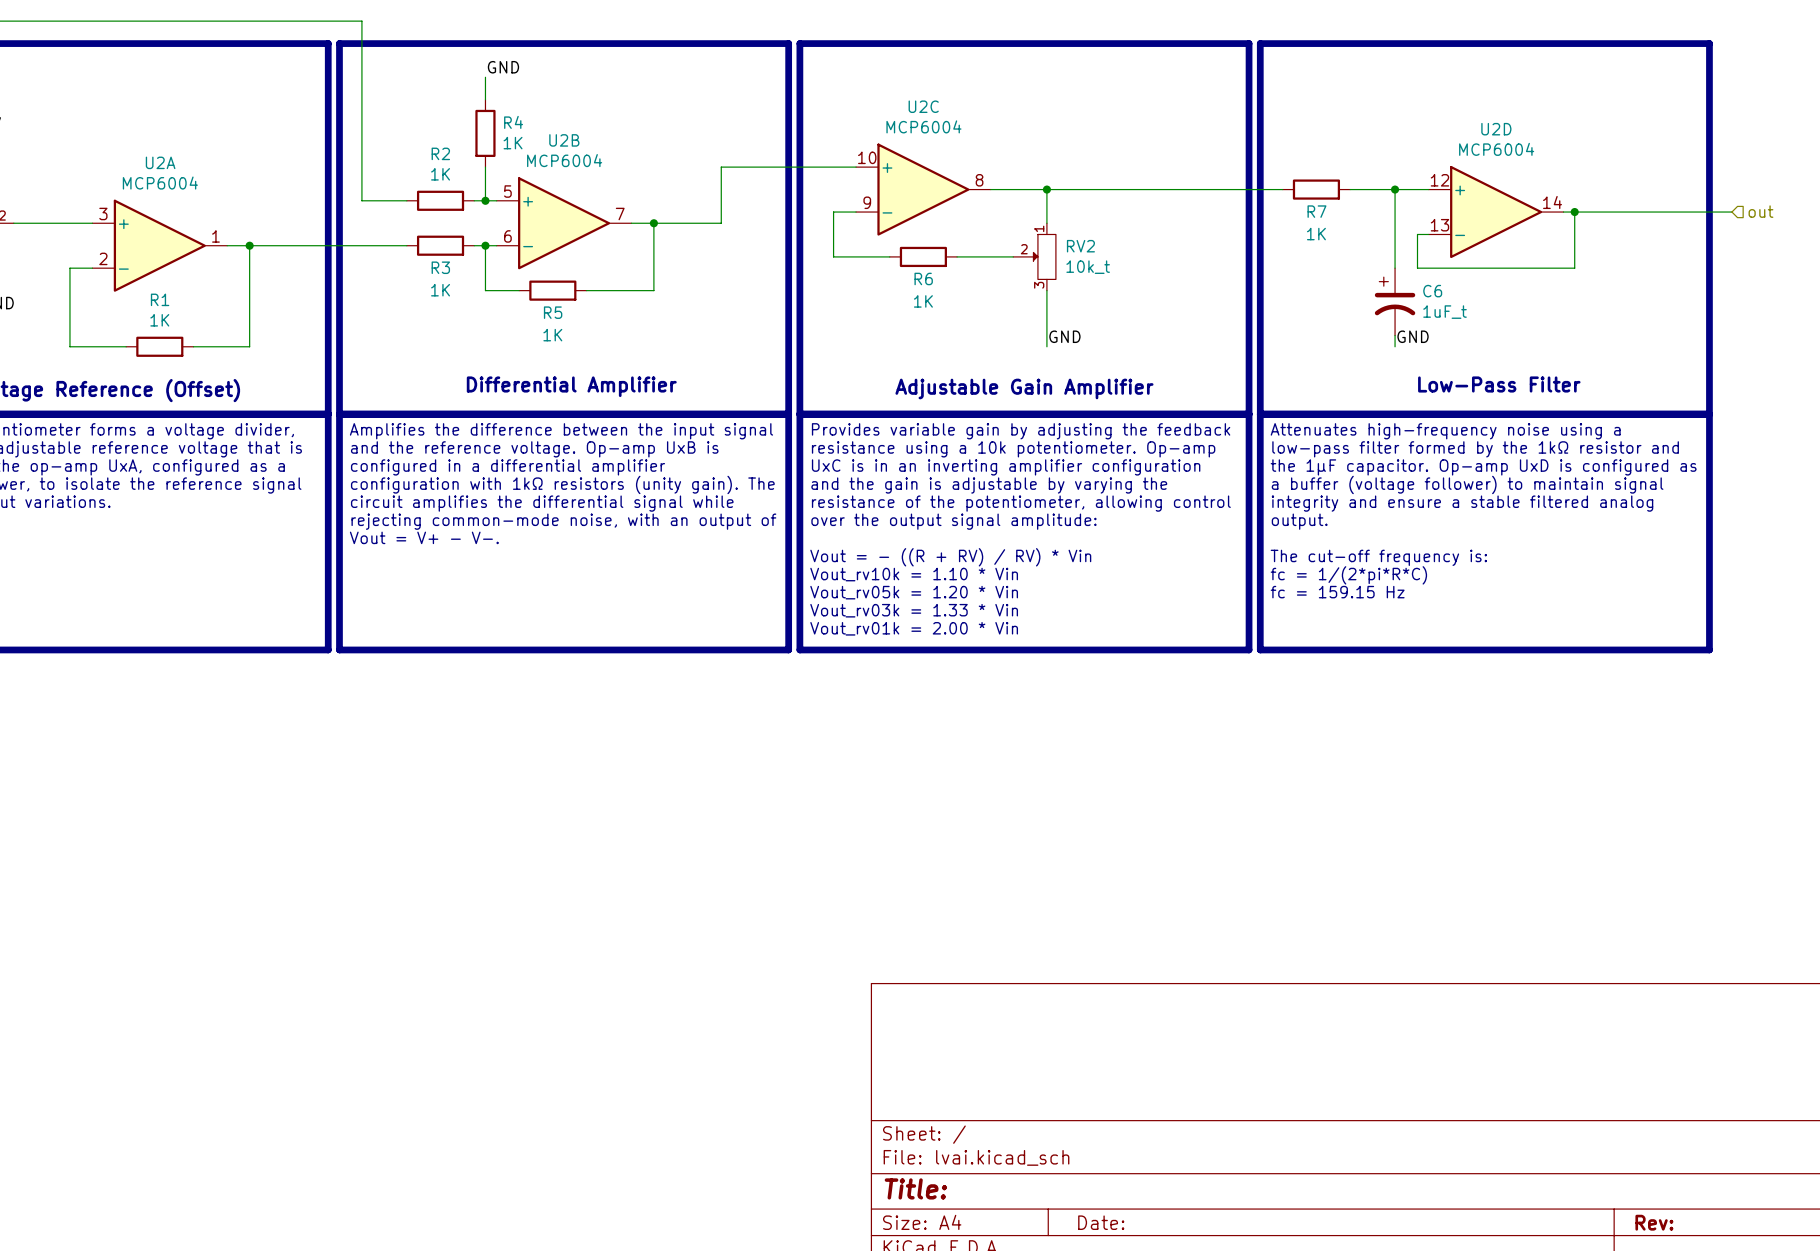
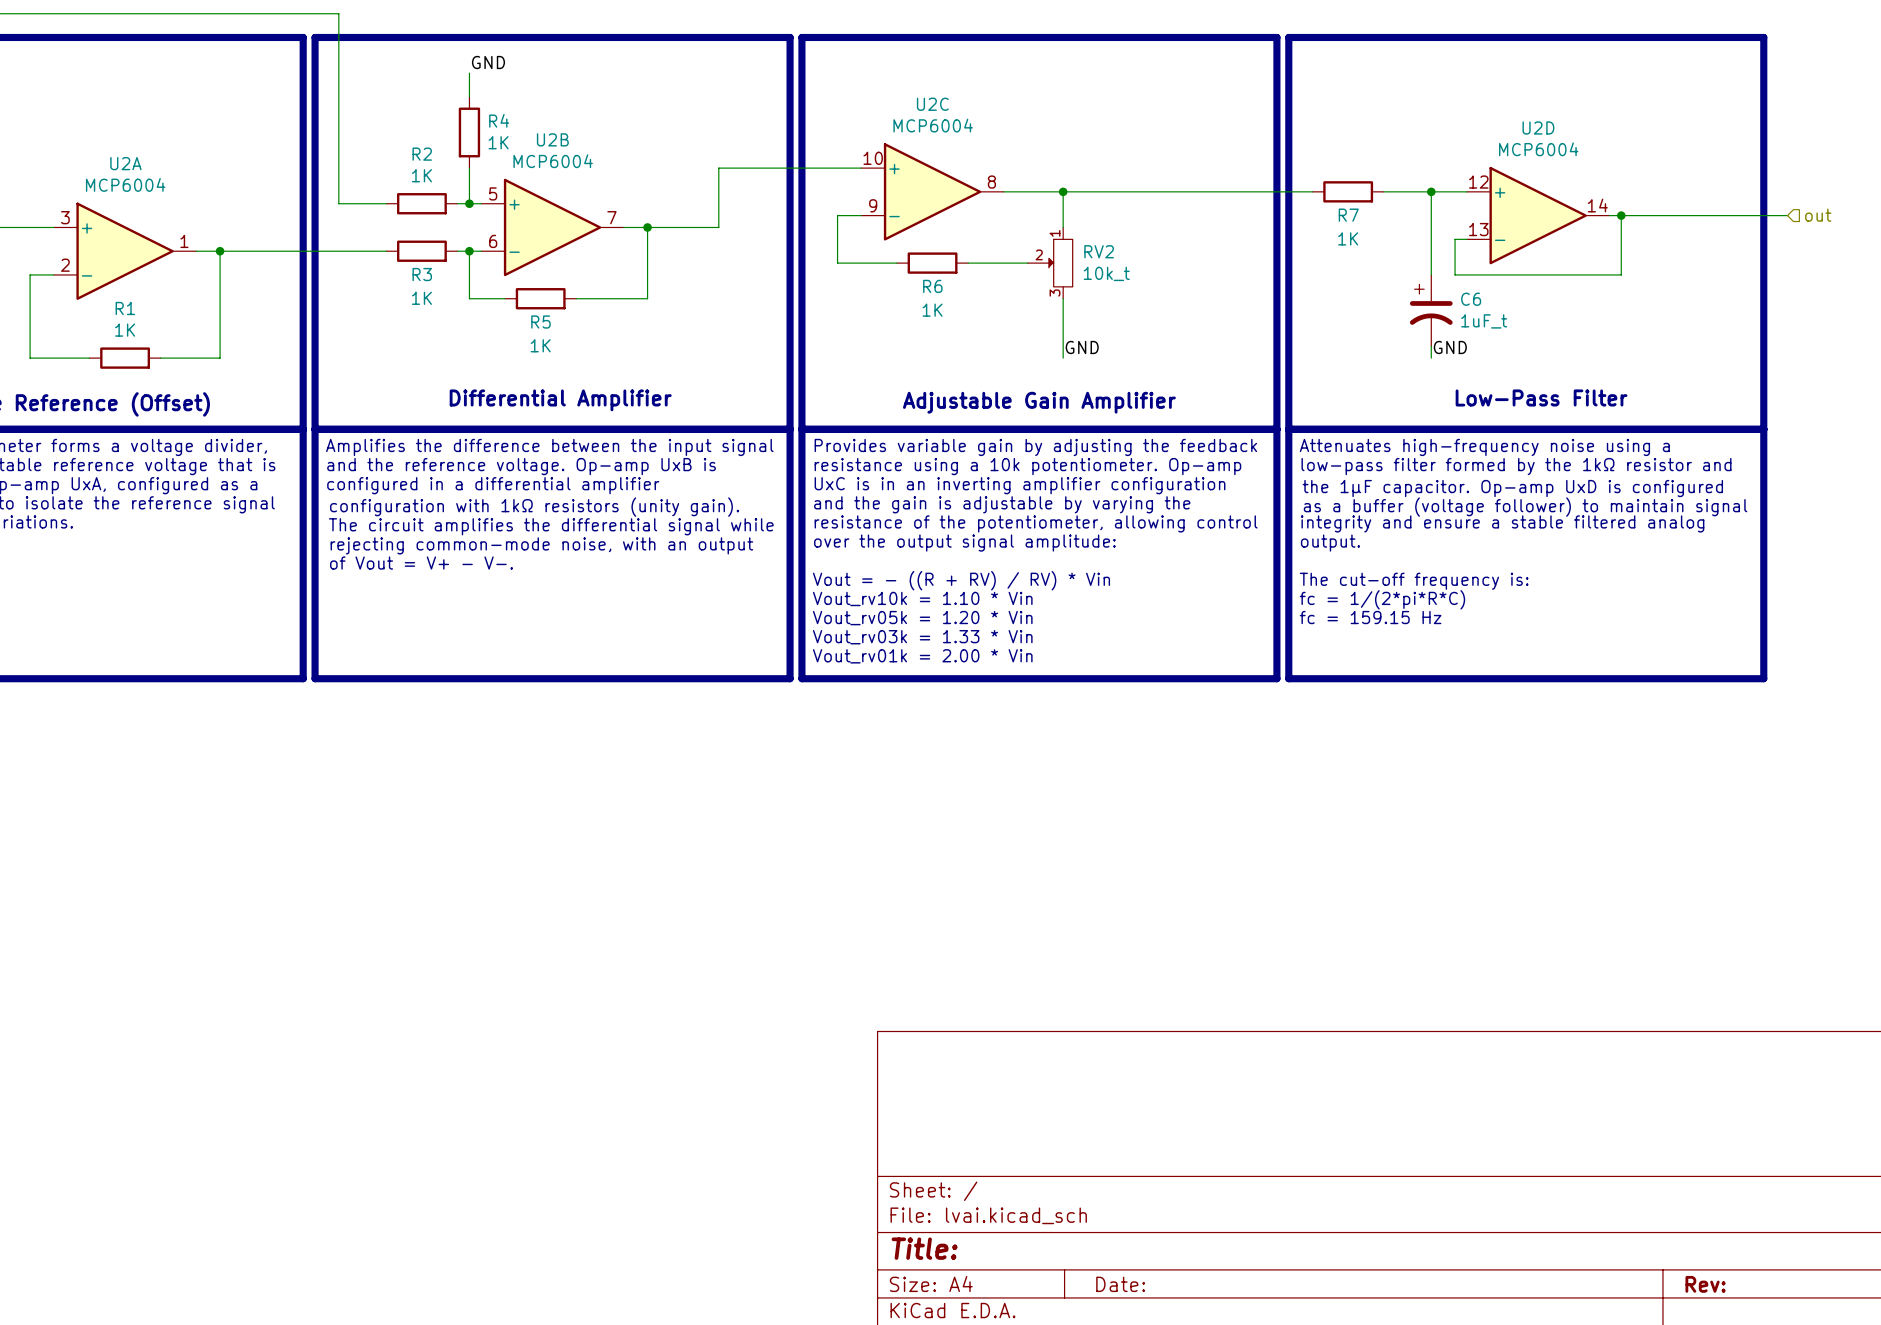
text: the 1μF capacitor. Op-amp UxD is configured as (1483, 467) -> the 1μF capacitor. Op-amp UxD is configured (1512, 488)
text: configuration with 1kΩ resistors (unity gain). The (562, 484) -> configuration with 1kΩ resistors (unity gain). (534, 507)
text: a buffer (voltage follower) to maintain signal (1467, 484) -> as a buffer (voltage follower) to maintain signal (1525, 507)
text: circuit amplifies the differential signal while (542, 503) -> The circuit amplifies the differential signal while (551, 526)
text: rejecting common-mode noise, with an output of (563, 521) -> rejecting common-mode noise, with an output (541, 545)
text: Vout = V+ - V-. (424, 537) -> of Vout = V+ - V-. (421, 563)

